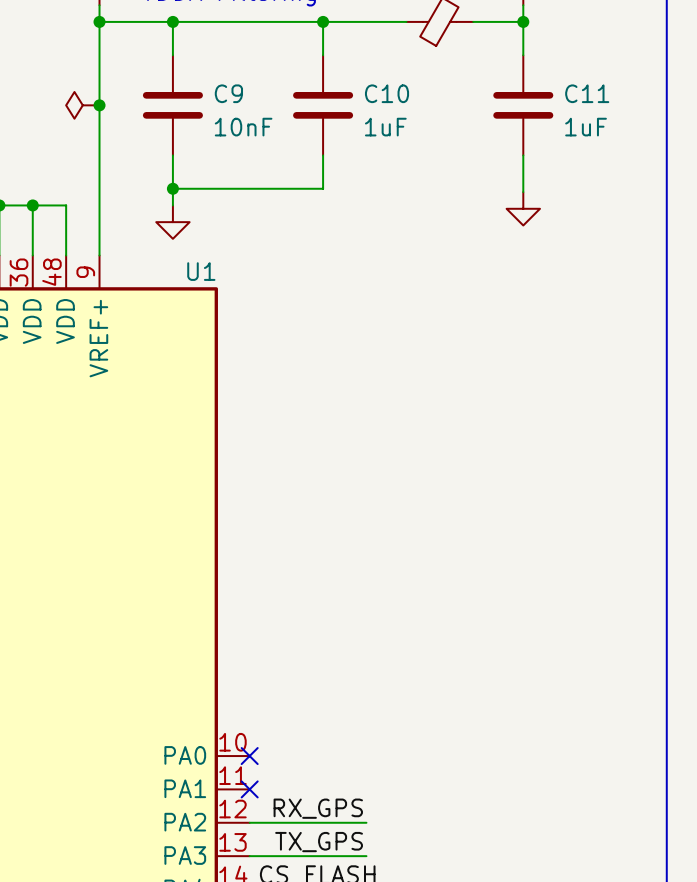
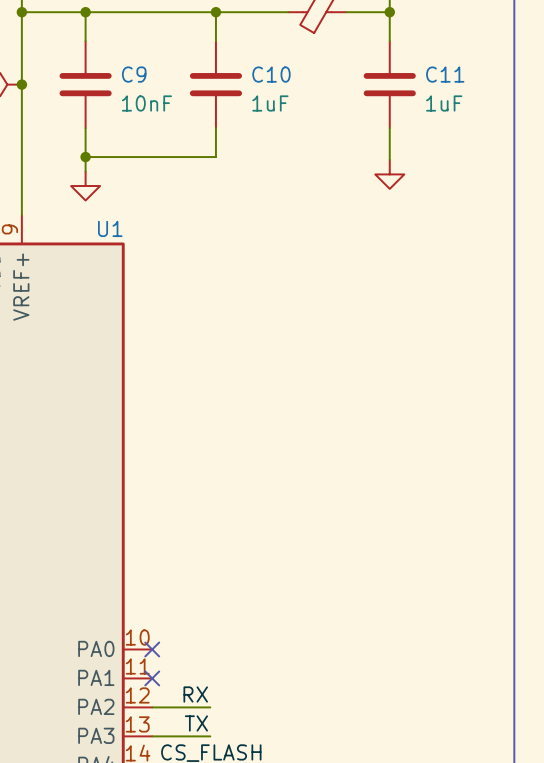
label: none -> RX (195, 694)
label: RX_GPS (318, 808) -> none
wire: (316, 822) (366, 822) -> none
label: none -> TX (196, 723)
label: TX_GPS (319, 842) -> none
wire: (316, 856) (366, 856) -> none

